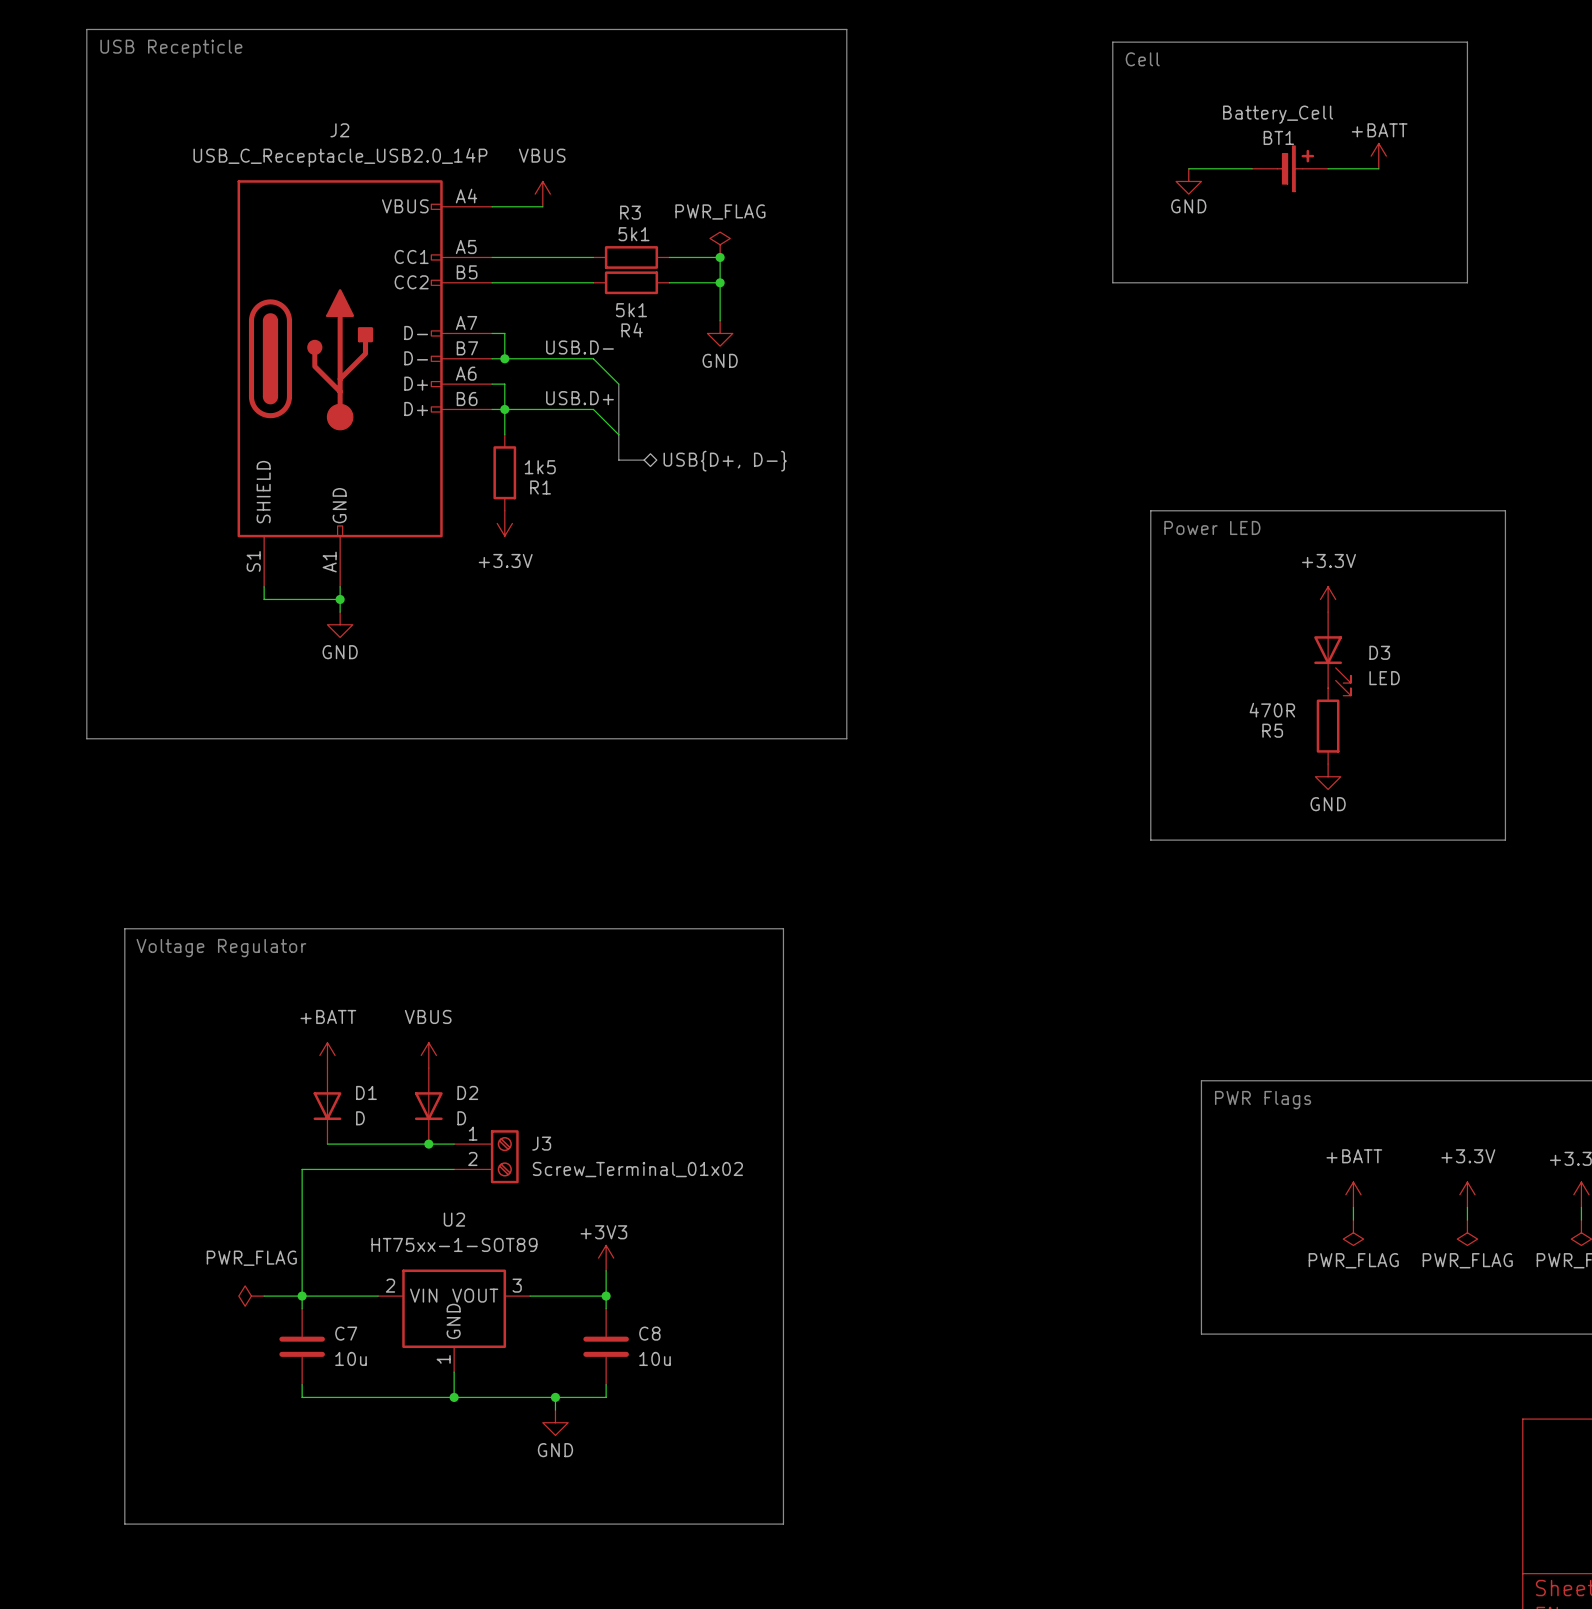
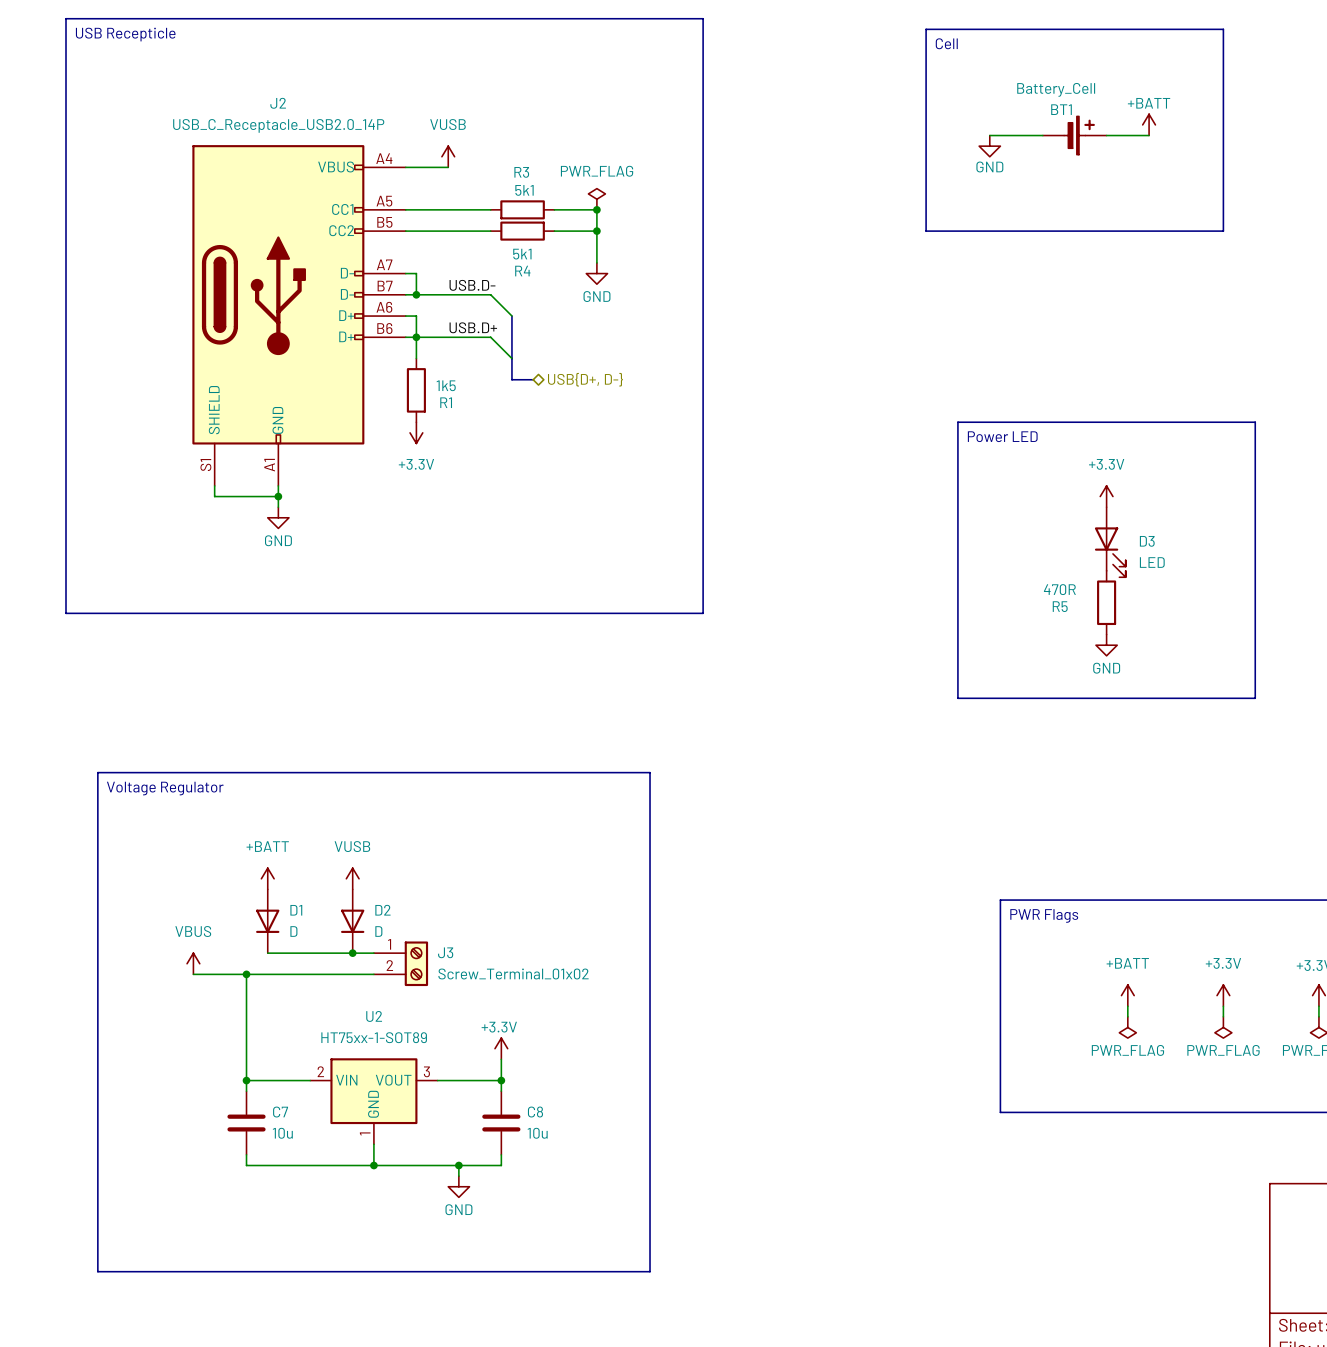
power symbol: VBUS (542, 194) -> VUSB (448, 156)
power symbol: VBUS (428, 1055) -> VUSB (352, 878)
power symbol: none -> VBUS (193, 963)
wire: none -> (193, 974) (246, 974)
junction: none -> (246, 974)
power symbol: +3V3 (606, 1258) -> +3.3V (501, 1048)
power symbol: PWR_FLAG (251, 1296) -> none
wire: (264, 1296) (302, 1296) -> none

